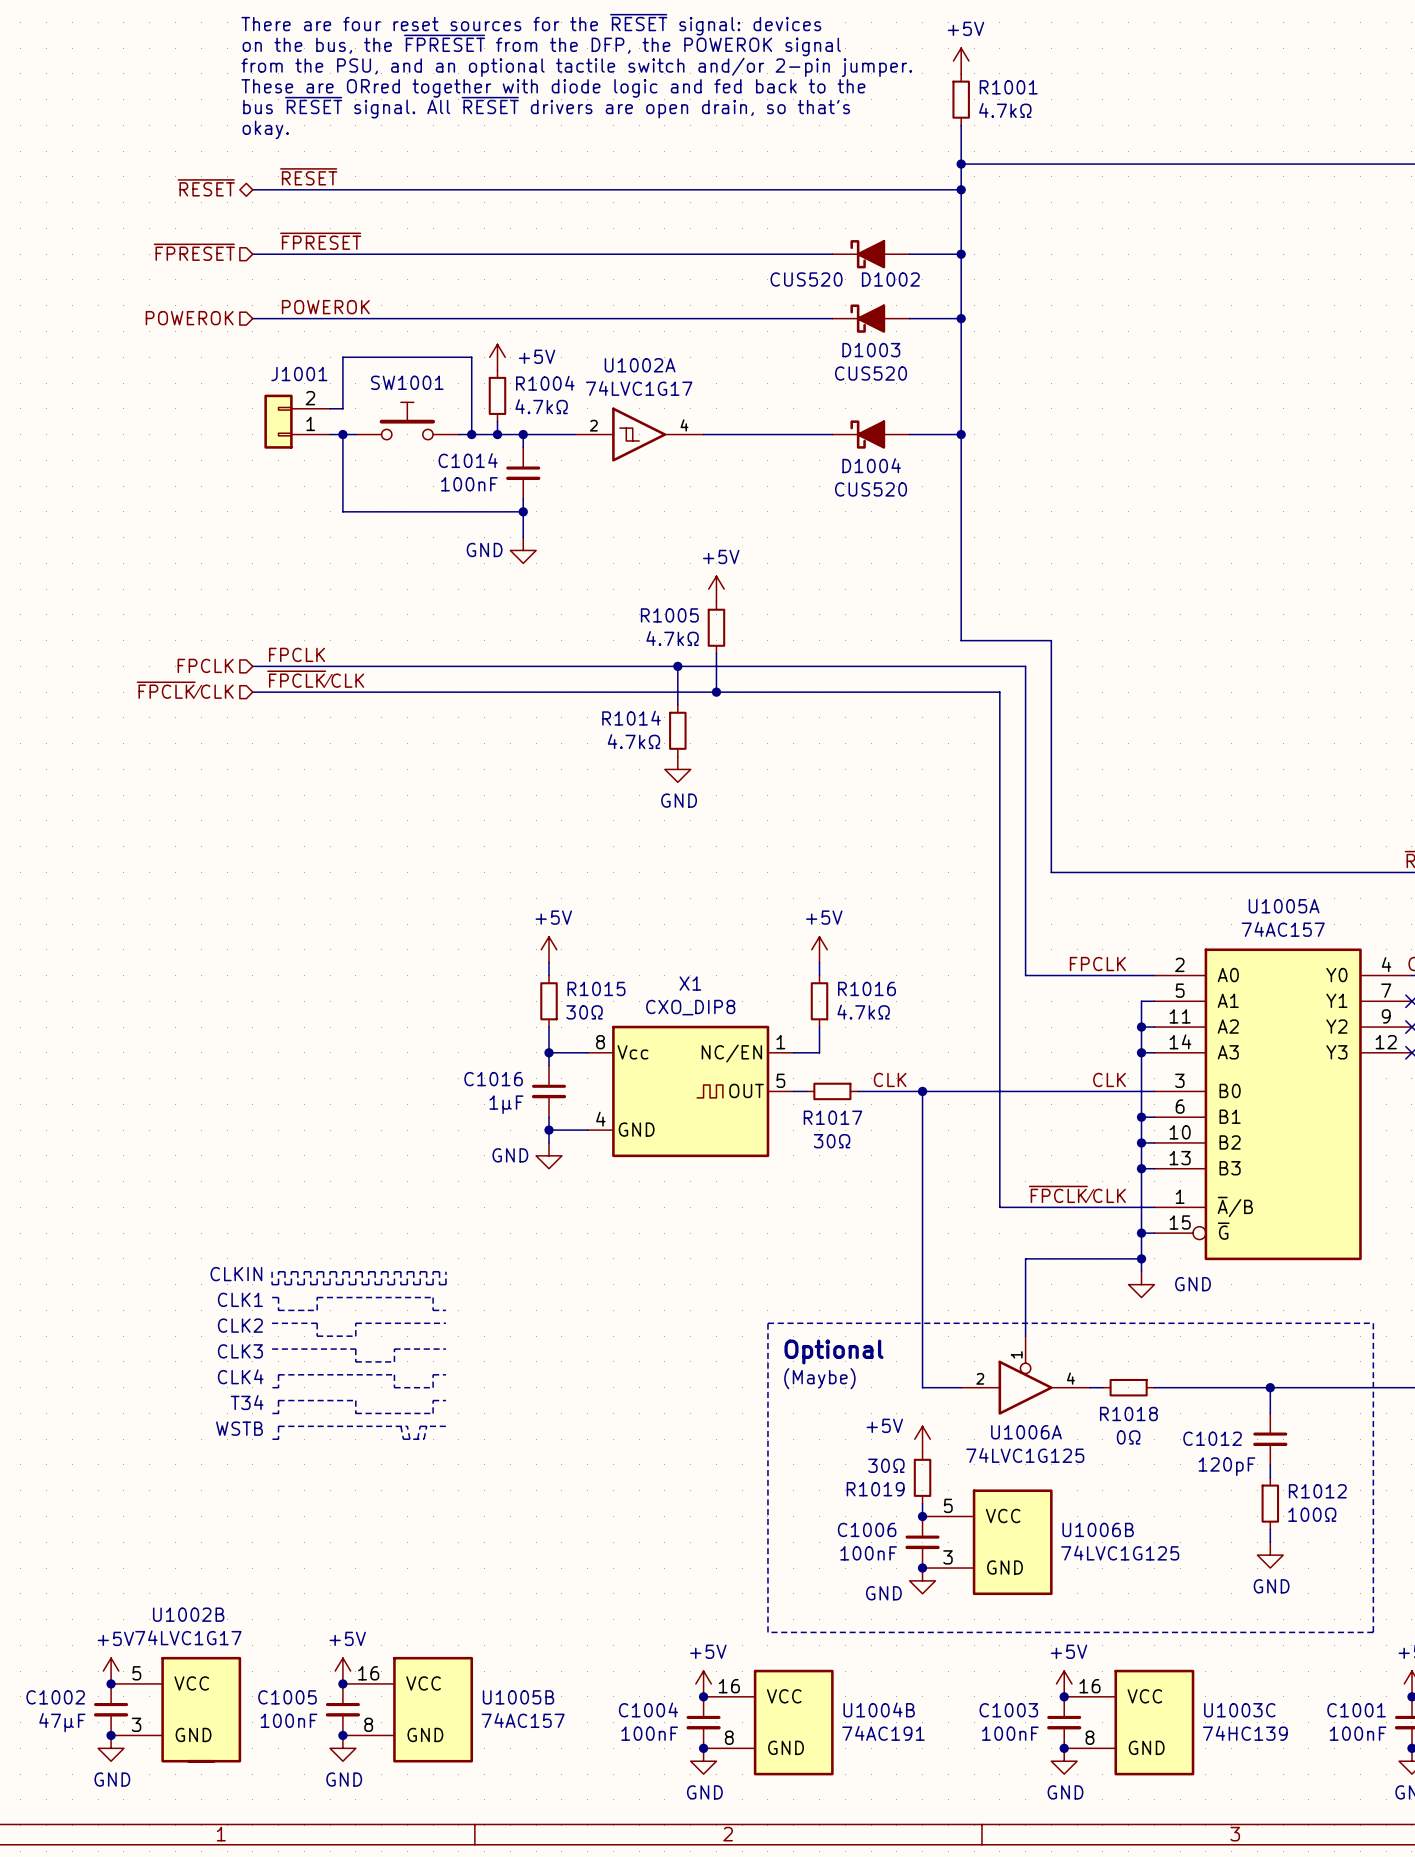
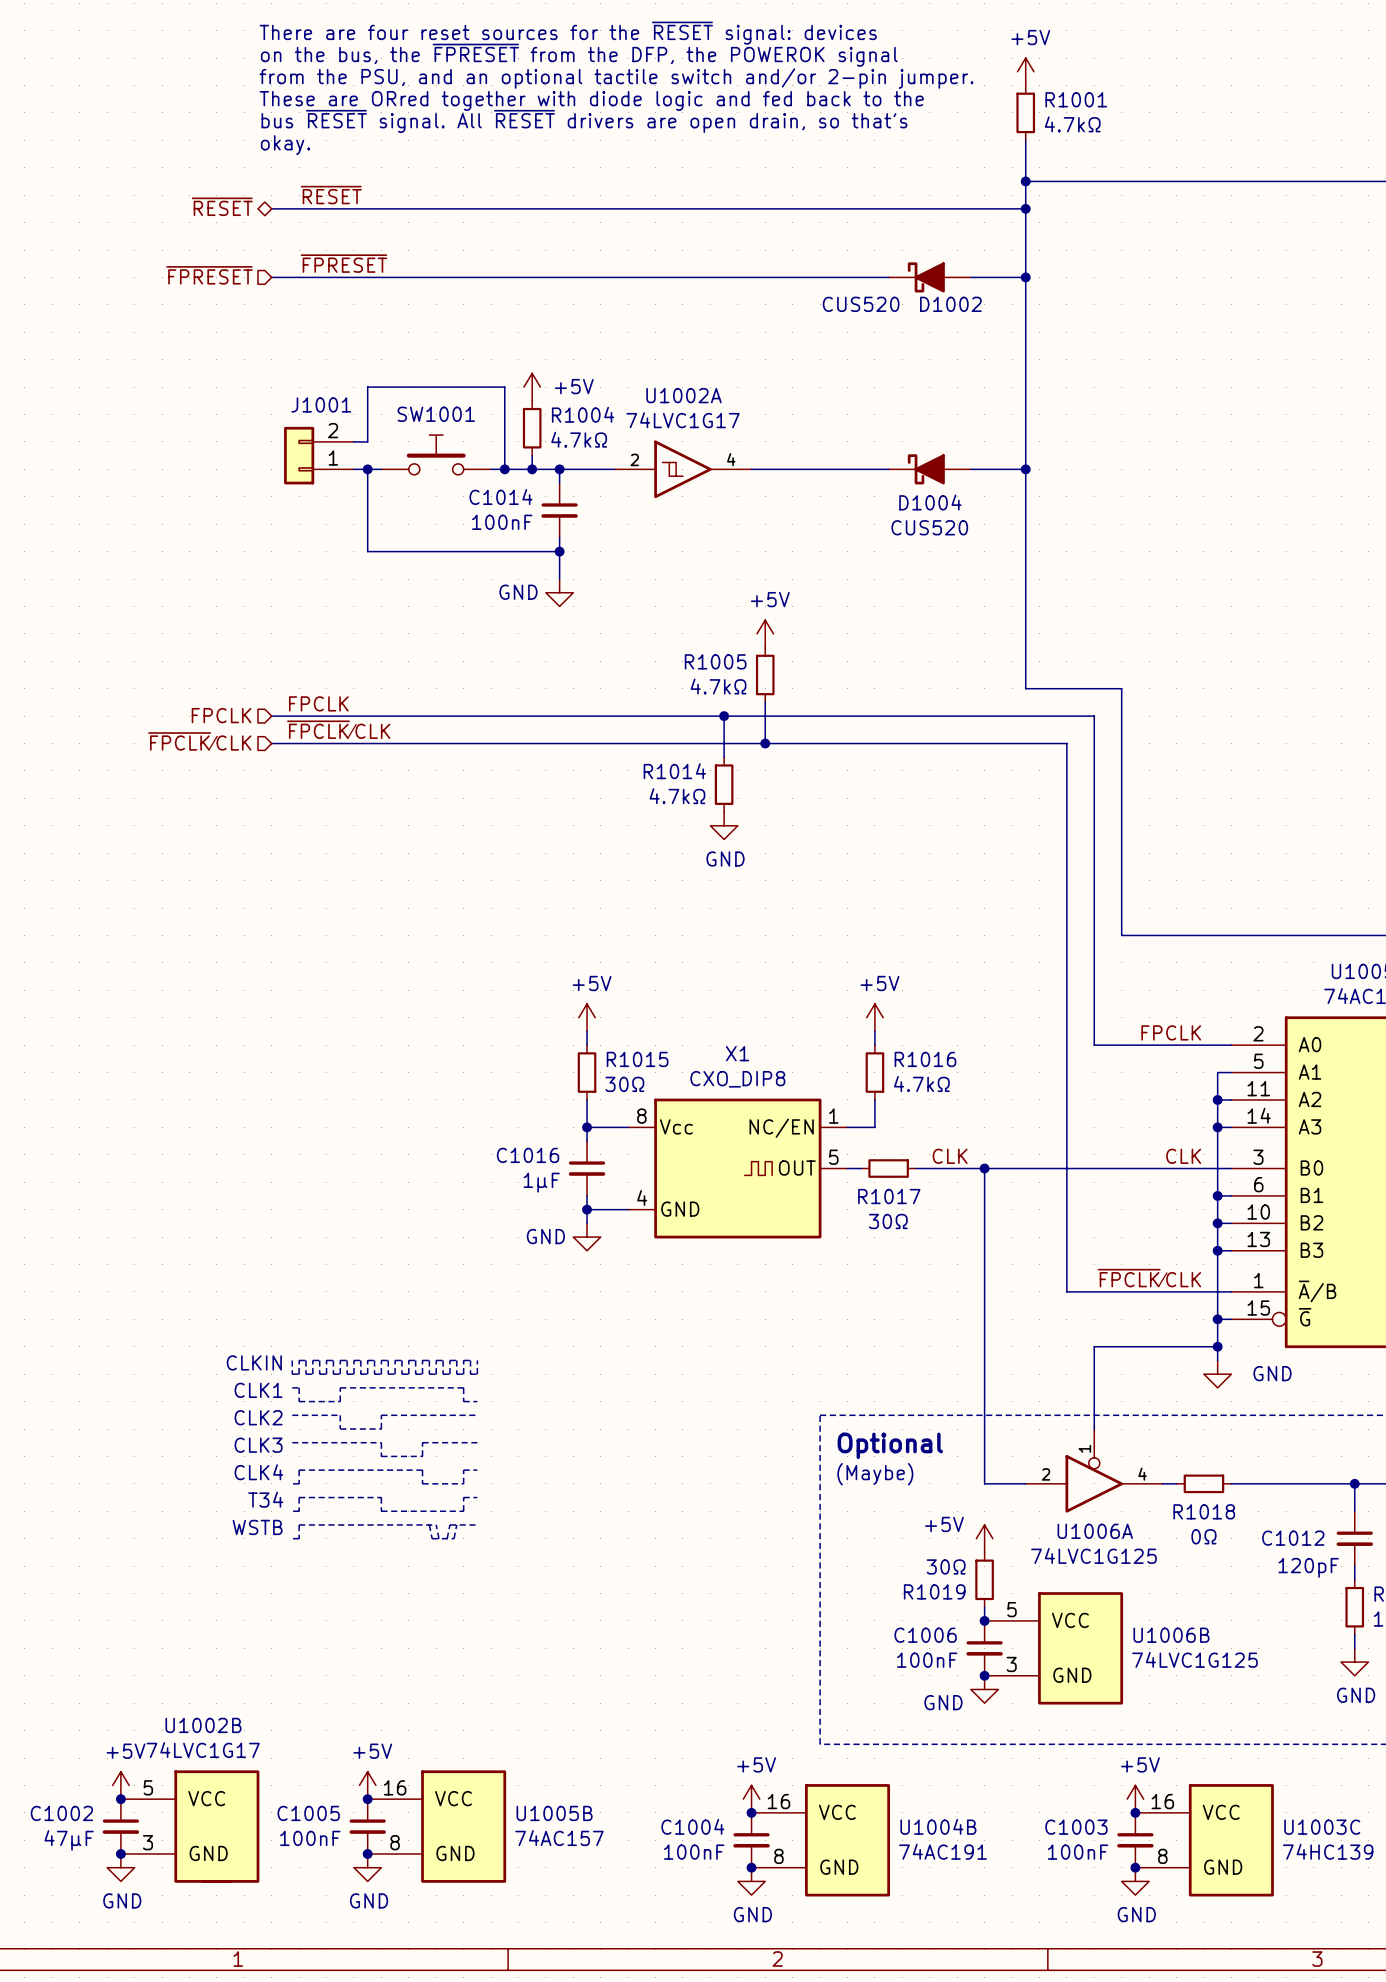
label: POWEROK (325, 307) -> none
hierarchical label: POWEROK (189, 318) -> none
wire: (252, 318) (832, 318) -> none
D1003: CUS520 (871, 318) -> none
wire: (909, 318) (961, 318) -> none
junction: (961, 318) -> none

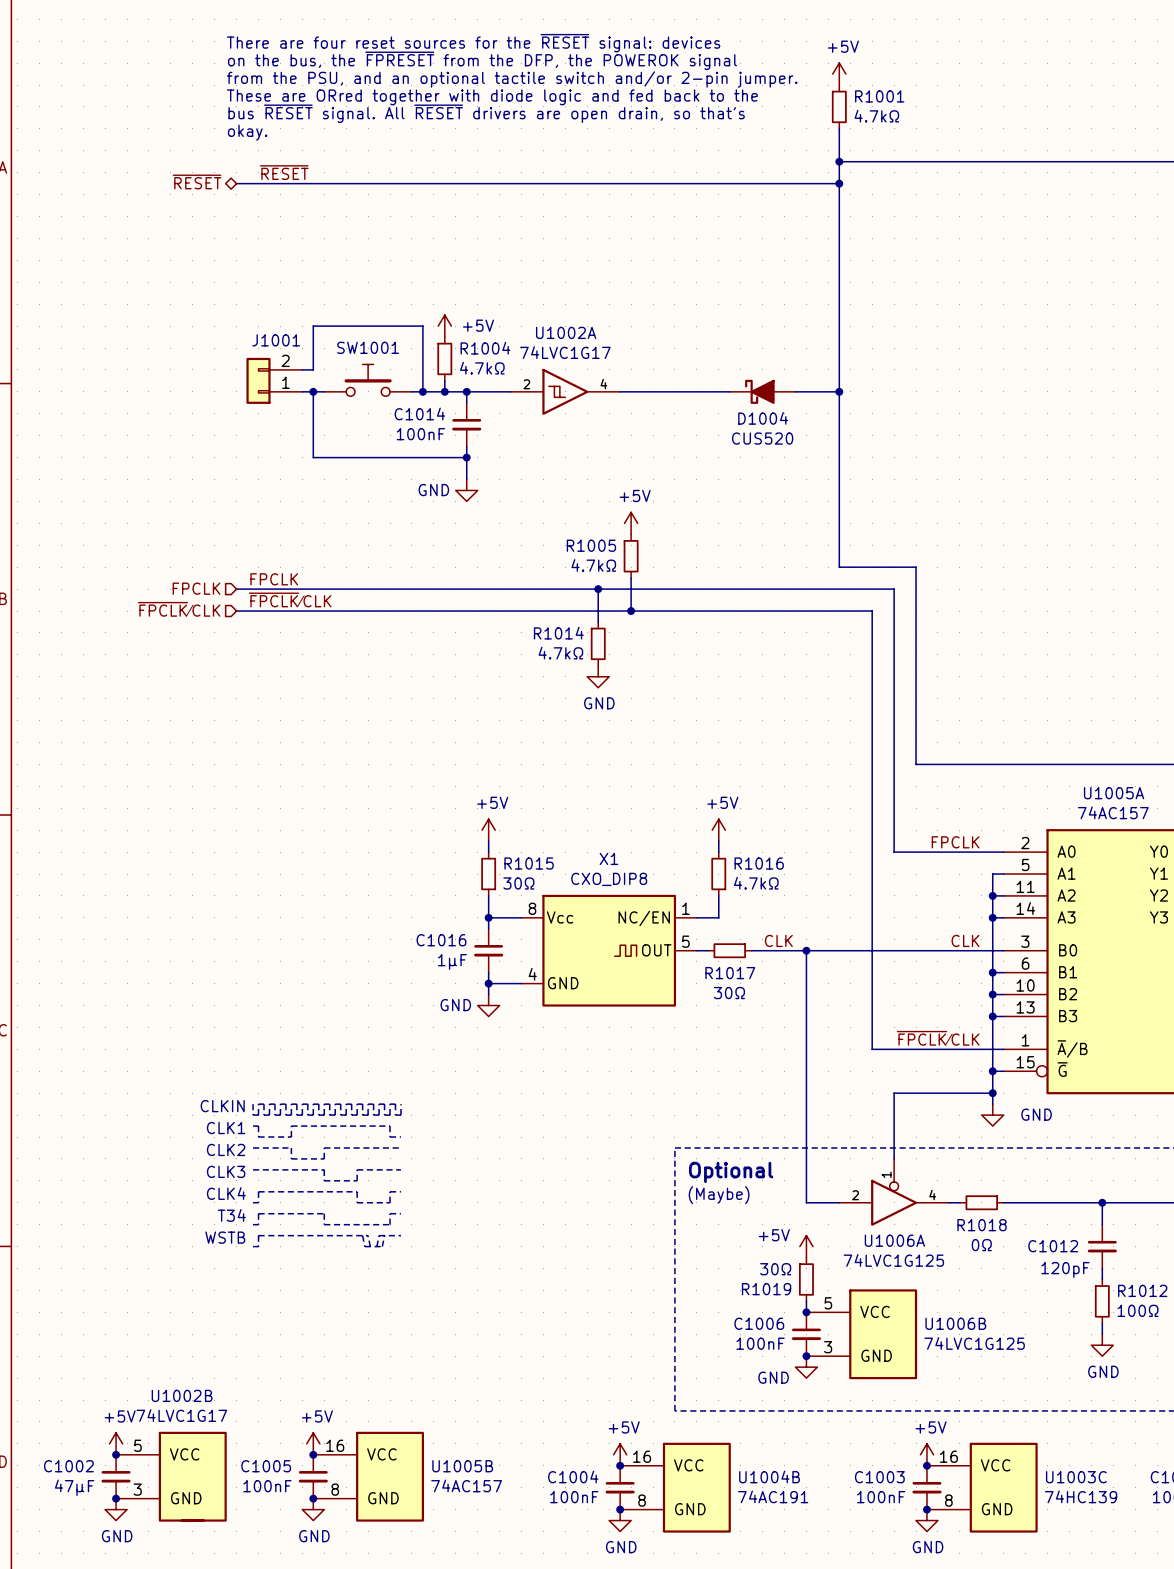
label: ~{FPRESET} (343, 263) -> none
hierarchical label: ~{FPRESET} (209, 275) -> none
wire: (271, 277) (888, 277) -> none
D1002: CUS520 (929, 277) -> none
wire: (970, 277) (1025, 277) -> none
junction: (1025, 277) -> none

